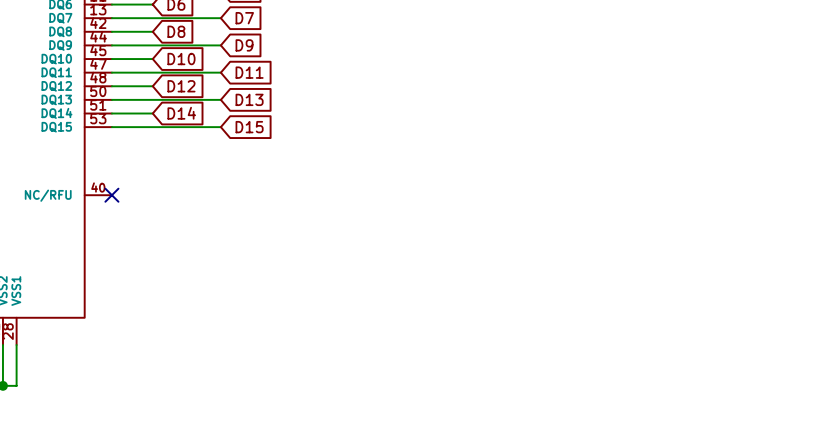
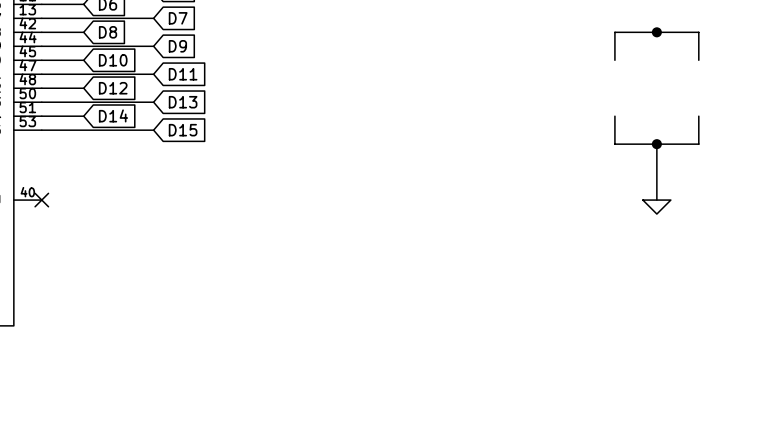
junction: none -> (656, 32)
wire: none -> (614, 60) (614, 32) (698, 32) (698, 60)
wire: none -> (614, 116) (614, 144) (698, 144) (698, 116)
wire: none -> (656, 144) (656, 200)
junction: none -> (656, 144)
power symbol: none -> (656, 207)

